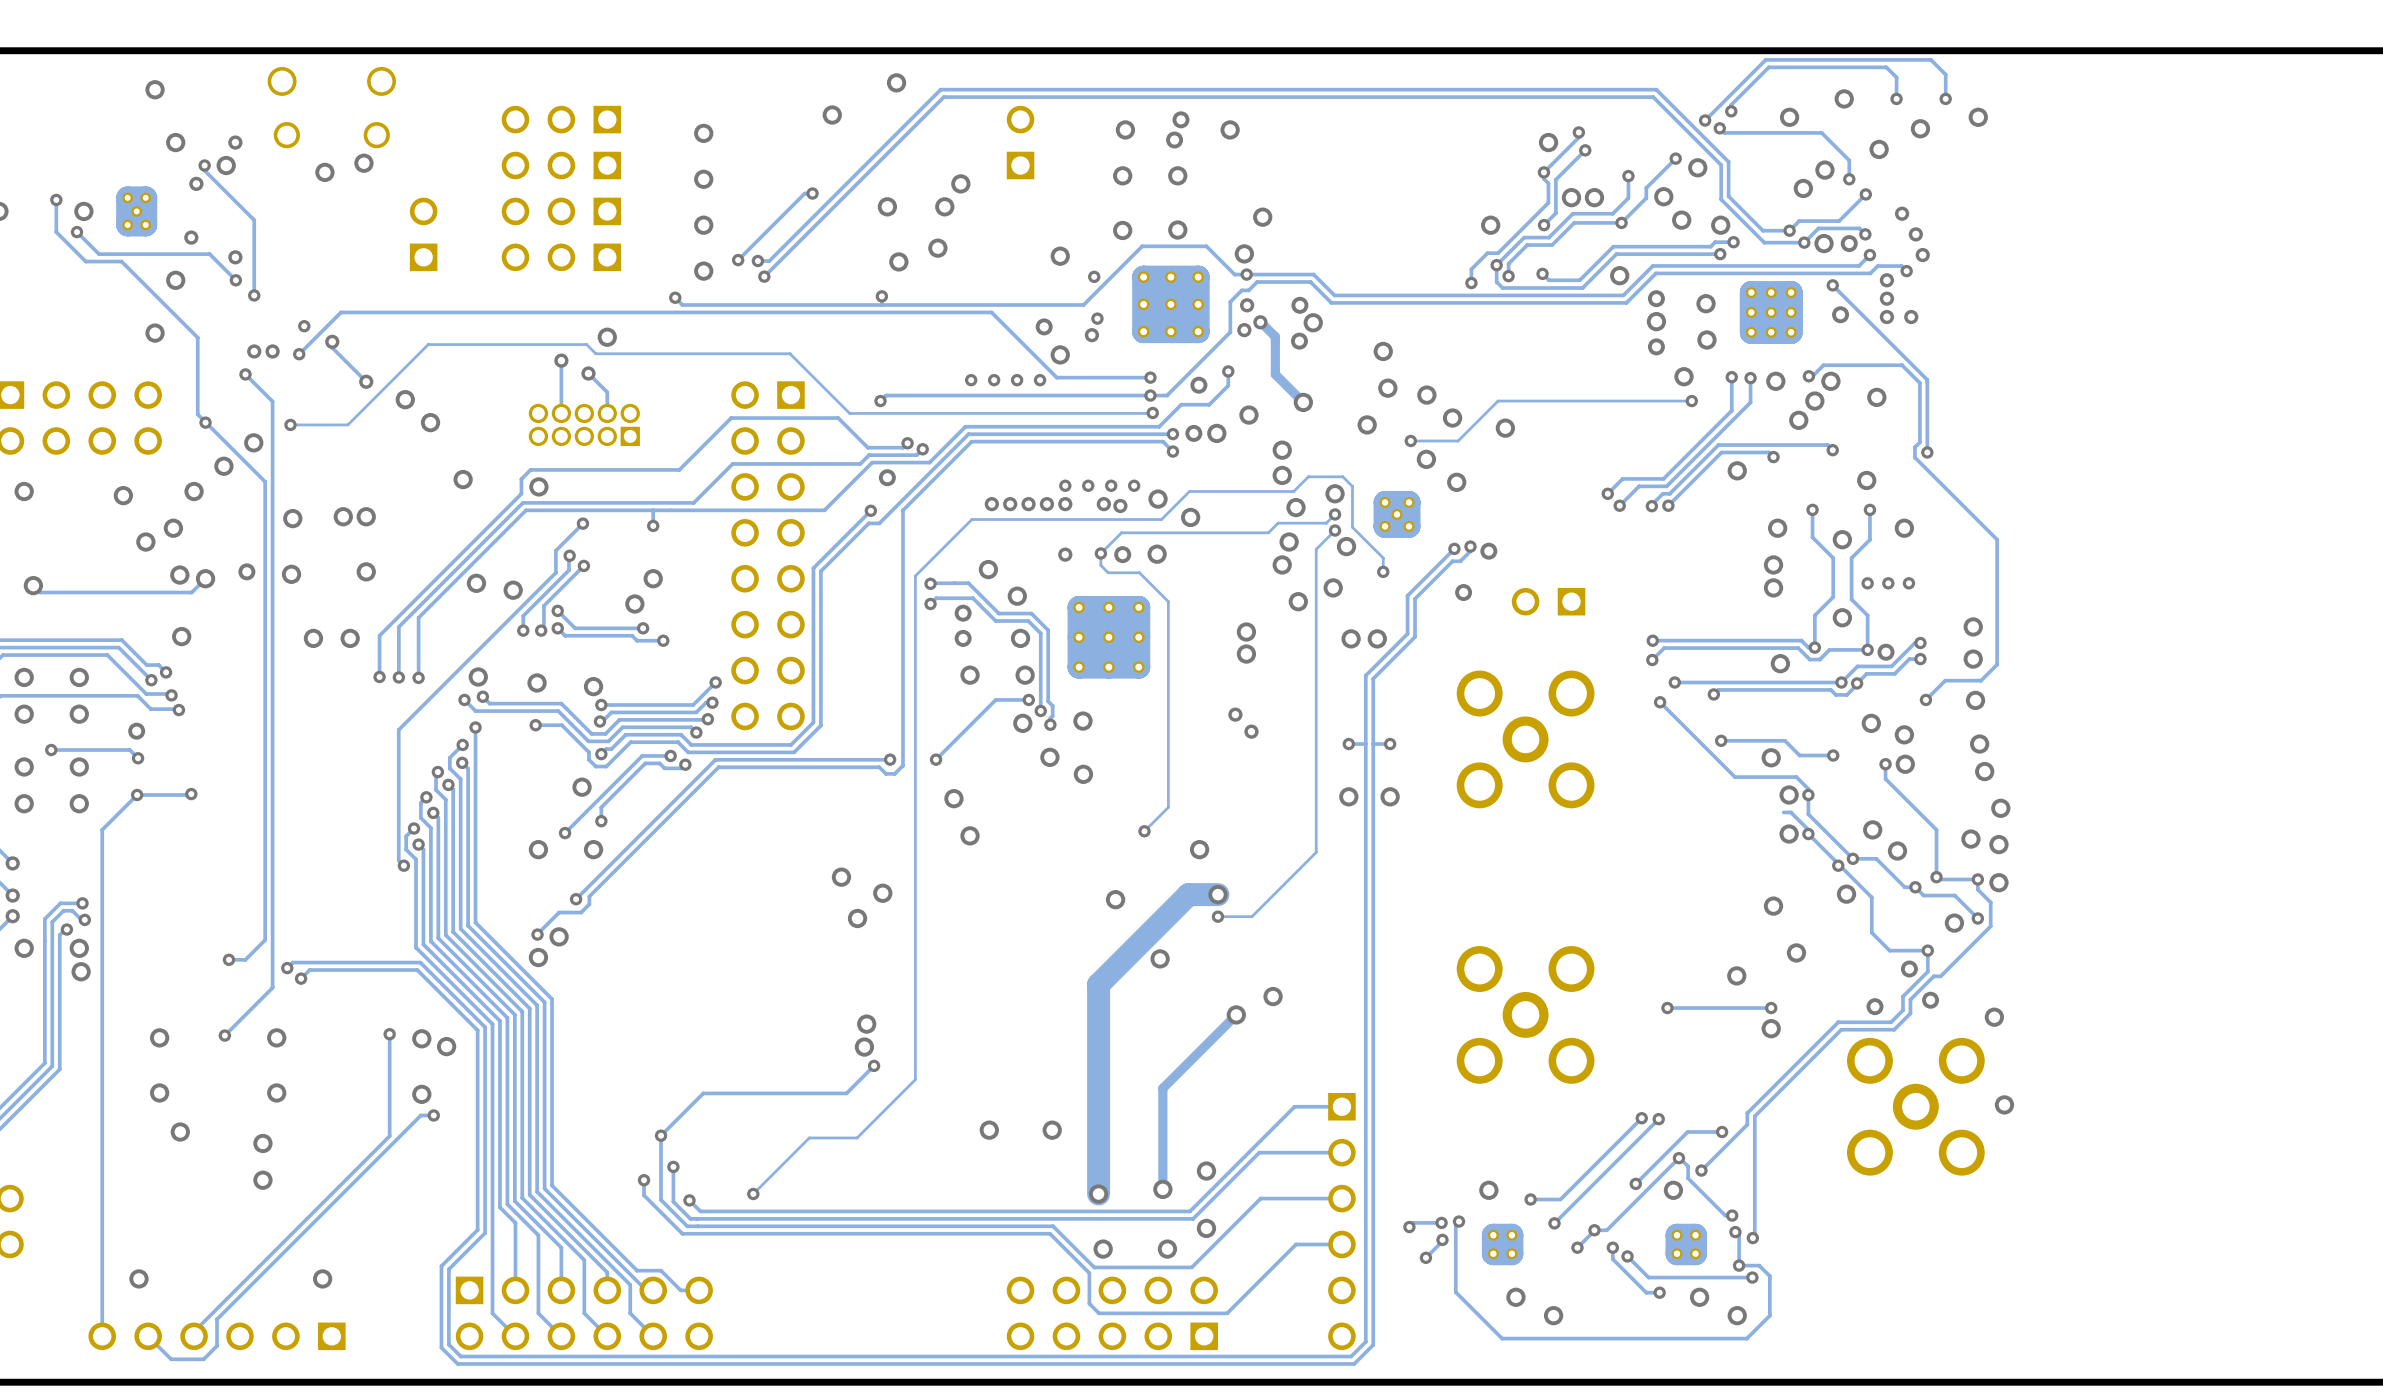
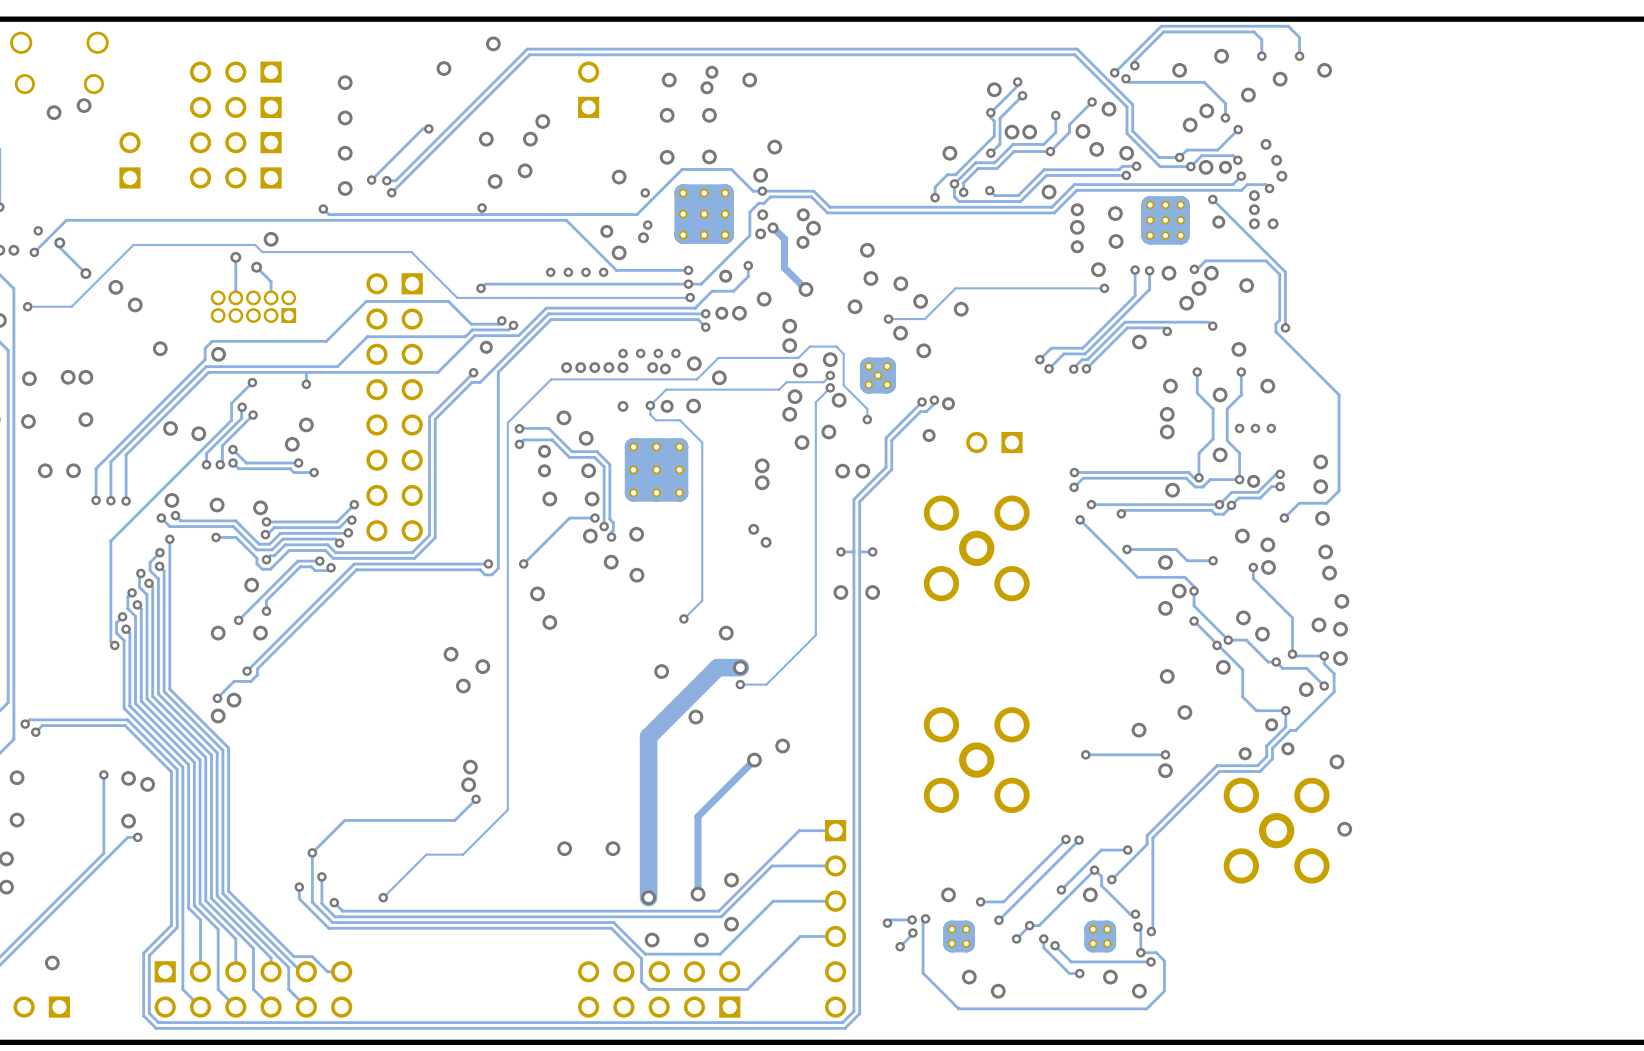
track: (1783, 812) (1790, 812) (1808, 829) (1808, 834) -> none
via position: (1789, 834) -> (1165, 608)

